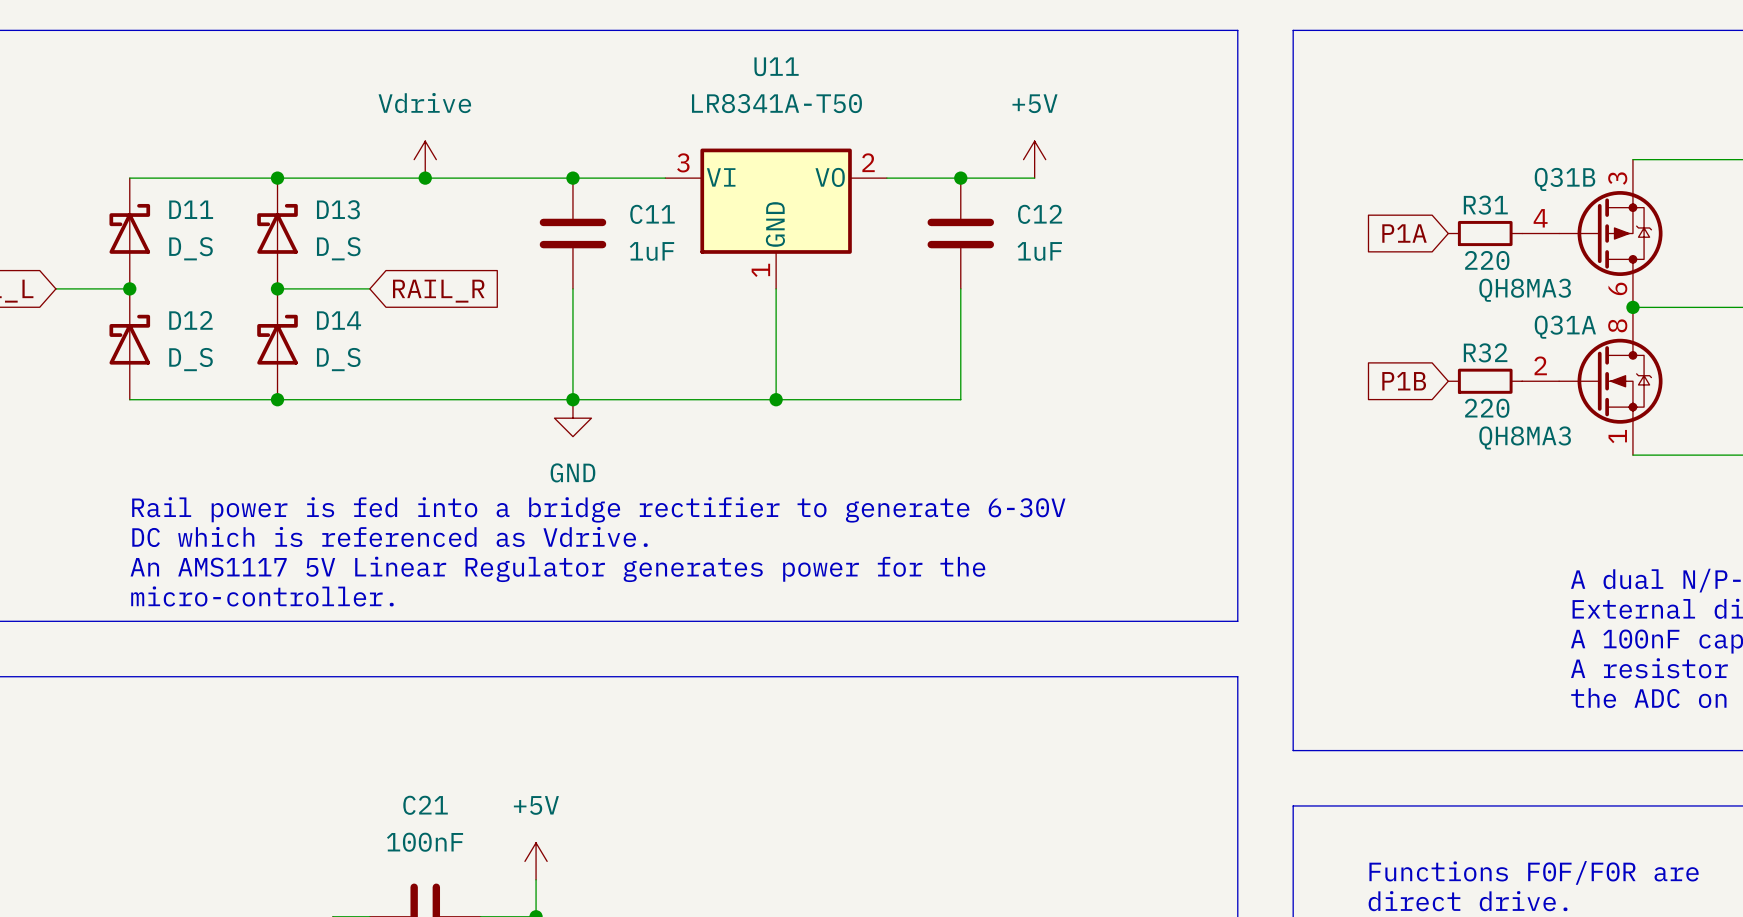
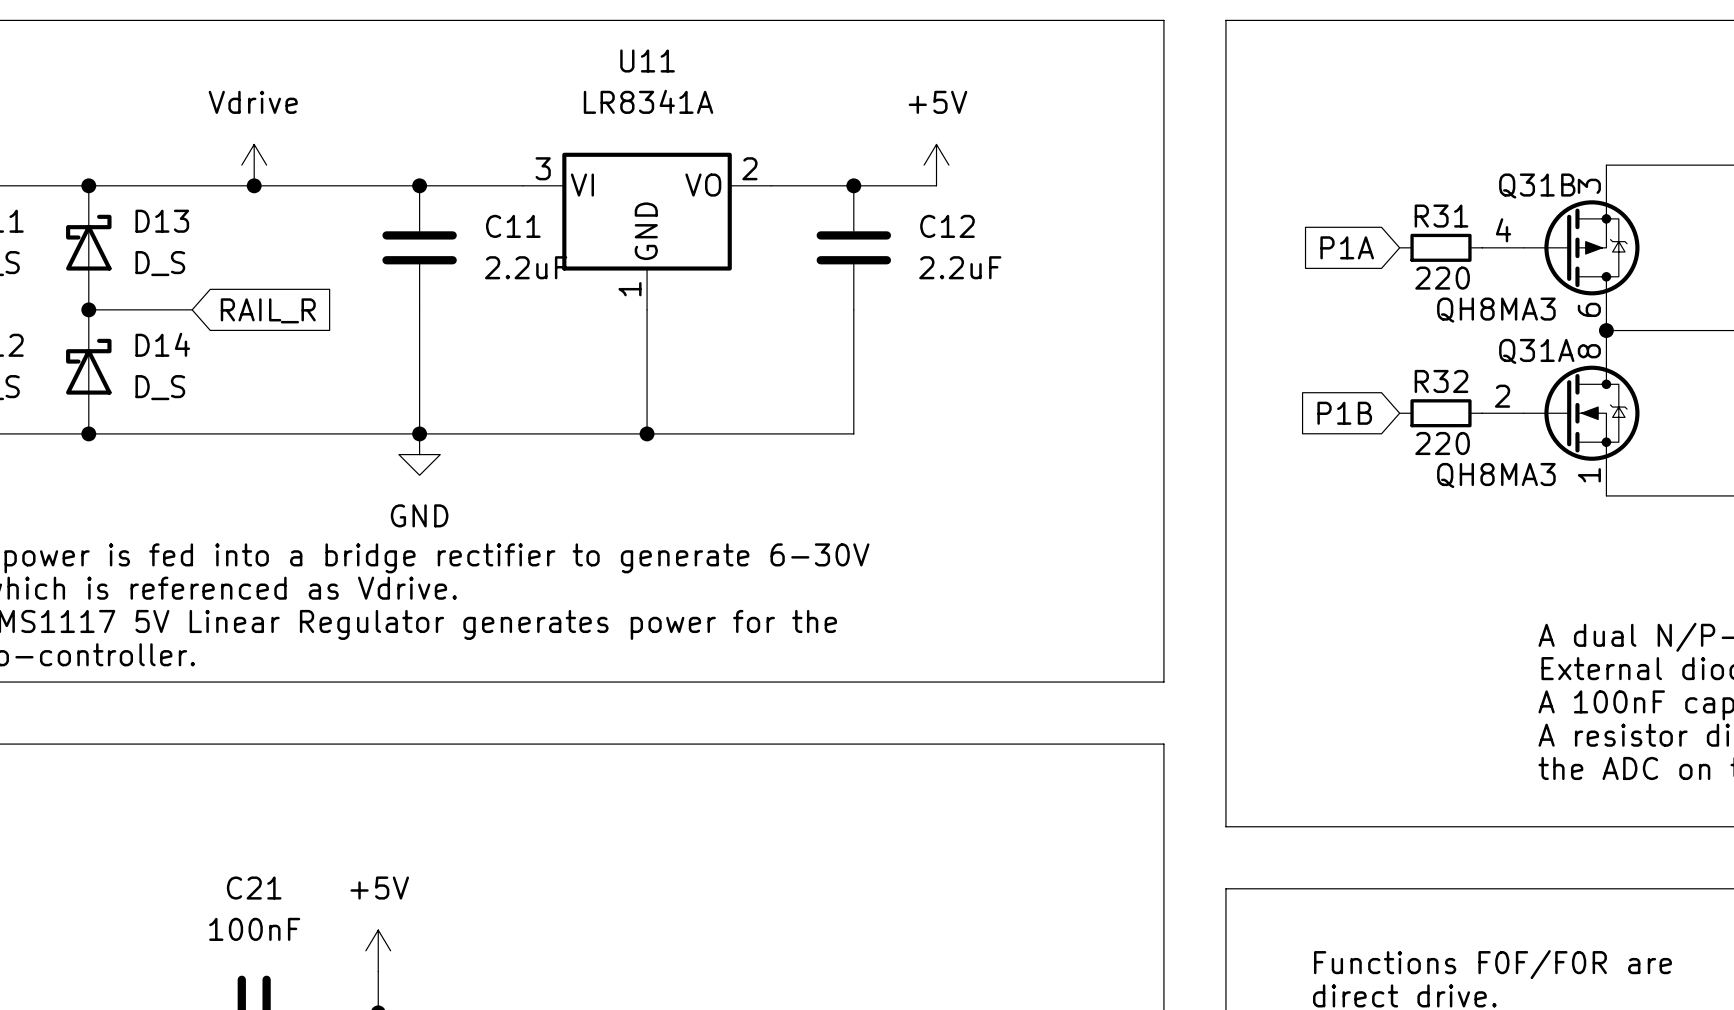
U11 value: LR8341A-T50 (776, 103) -> LR8341A (648, 101)
C11 value: 1uF (651, 251) -> 2.2uF (526, 267)
C12 value: 1uF (1039, 251) -> 2.2uF (960, 267)

